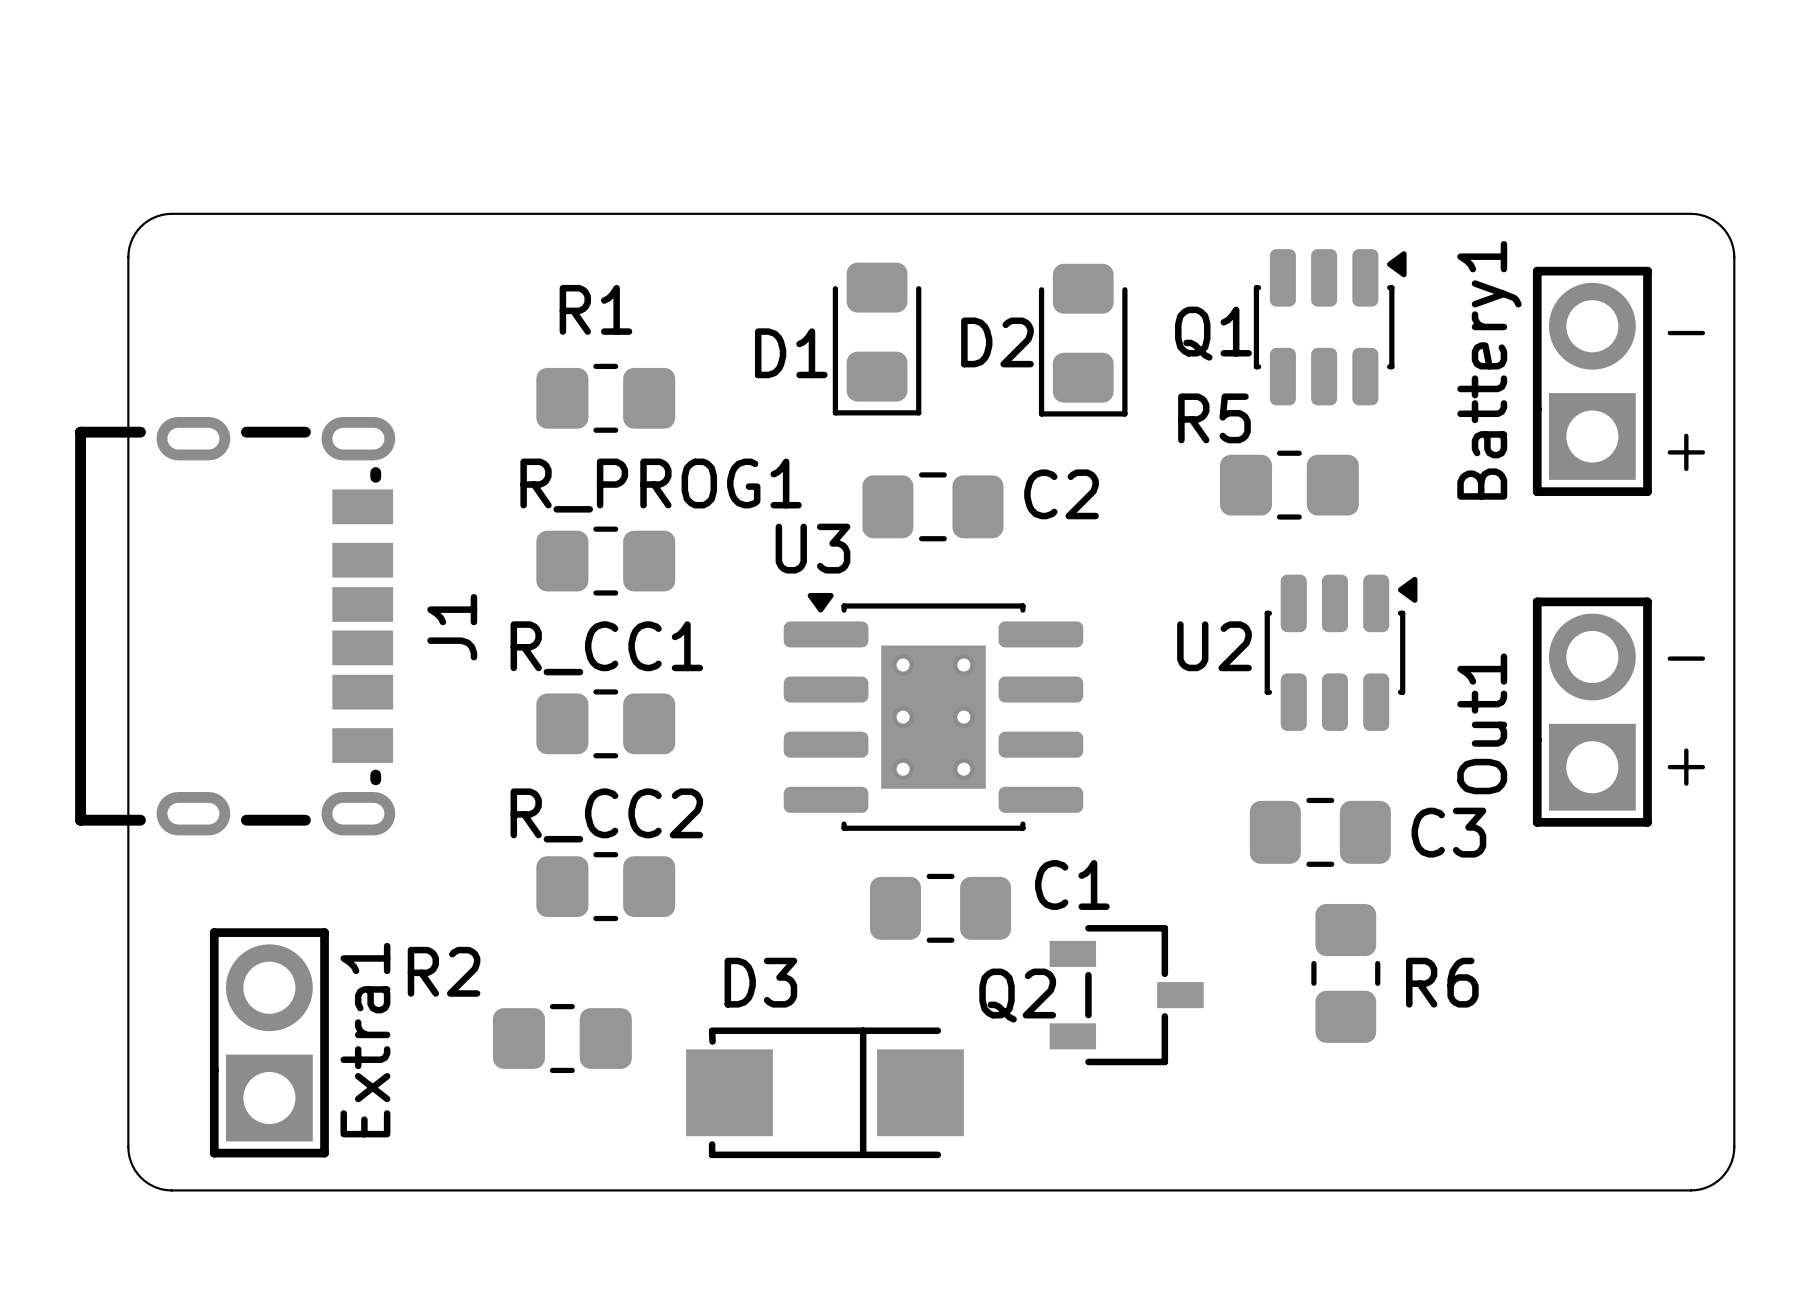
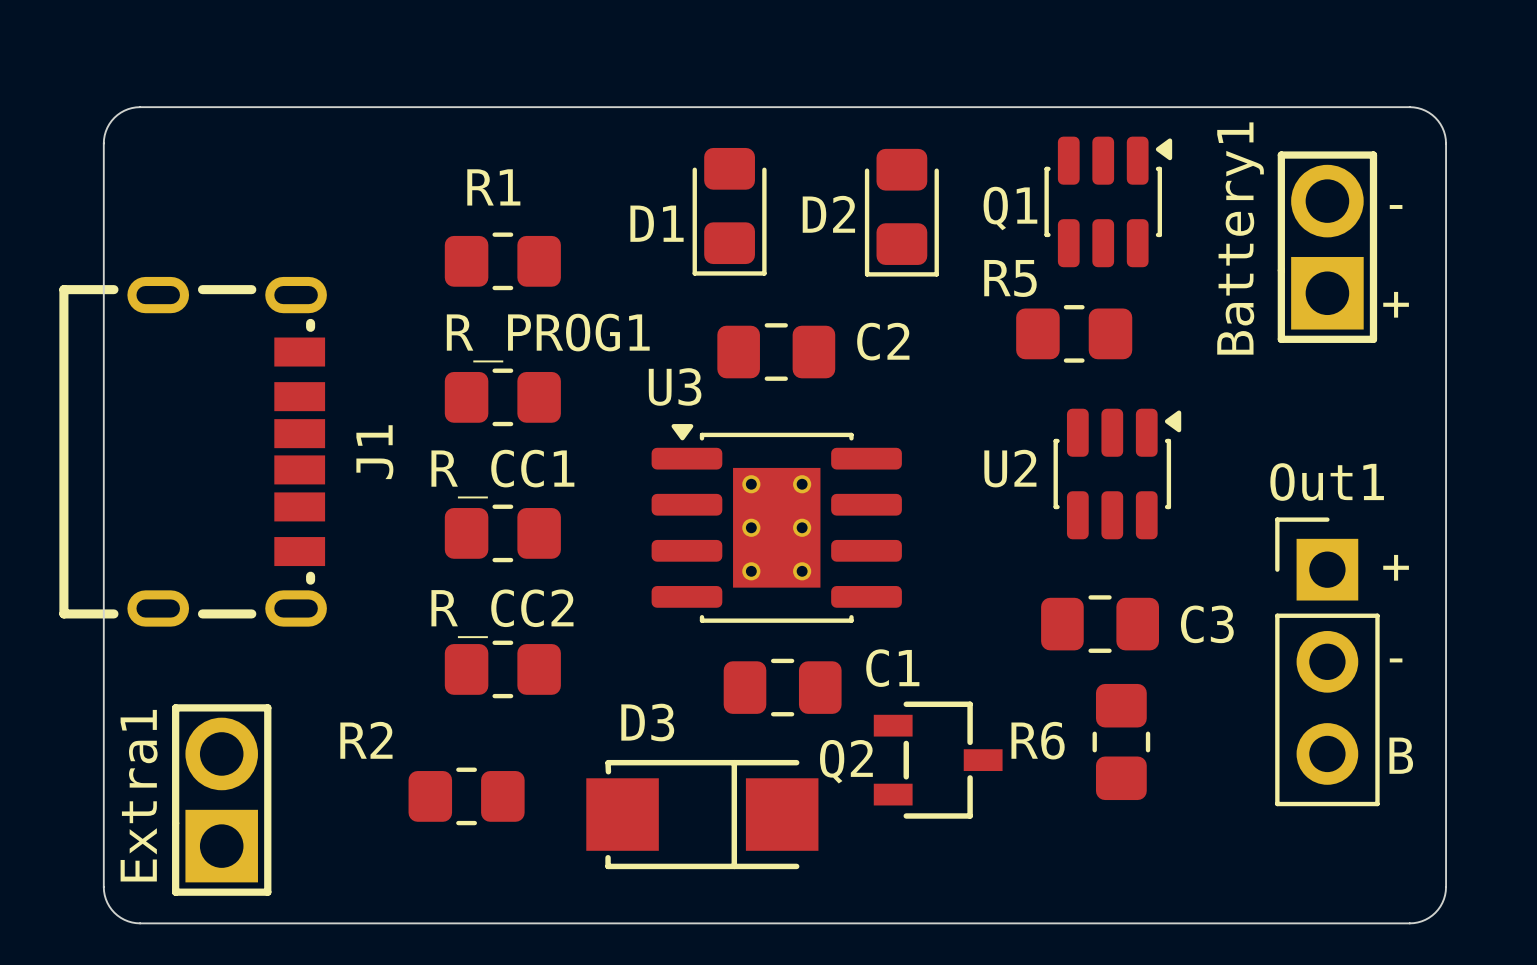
Out1 footprint: [1532, 597, 1652, 827] -> [1275, 517, 1380, 807]
text position: - (1686, 658) -> - (1396, 660)
Out1 name position: Out1 (1482, 723) -> Out1 (1327, 482)
R6 name position: R6 (1442, 982) -> R6 (1038, 740)
text: none -> B (1401, 755)
Extra1 name position: Extra1 (365, 1040) -> Extra1 (139, 795)
D3 position: (824, 1092) -> (702, 814)

